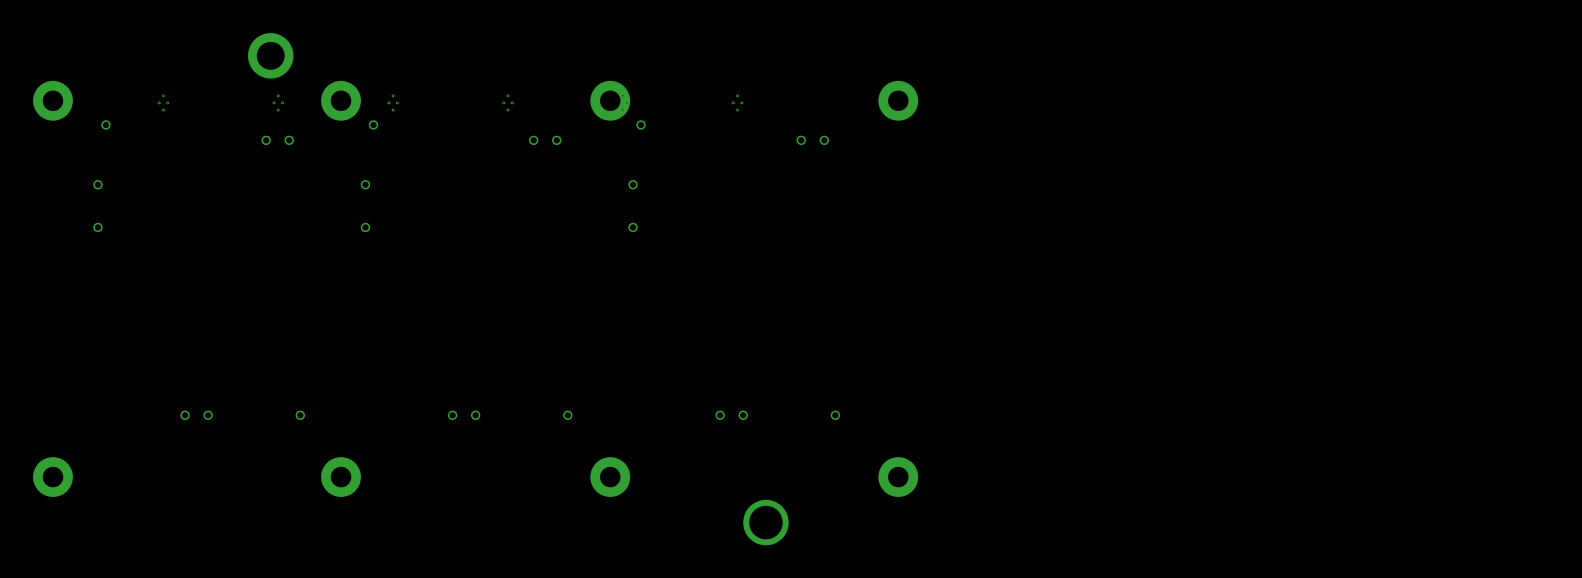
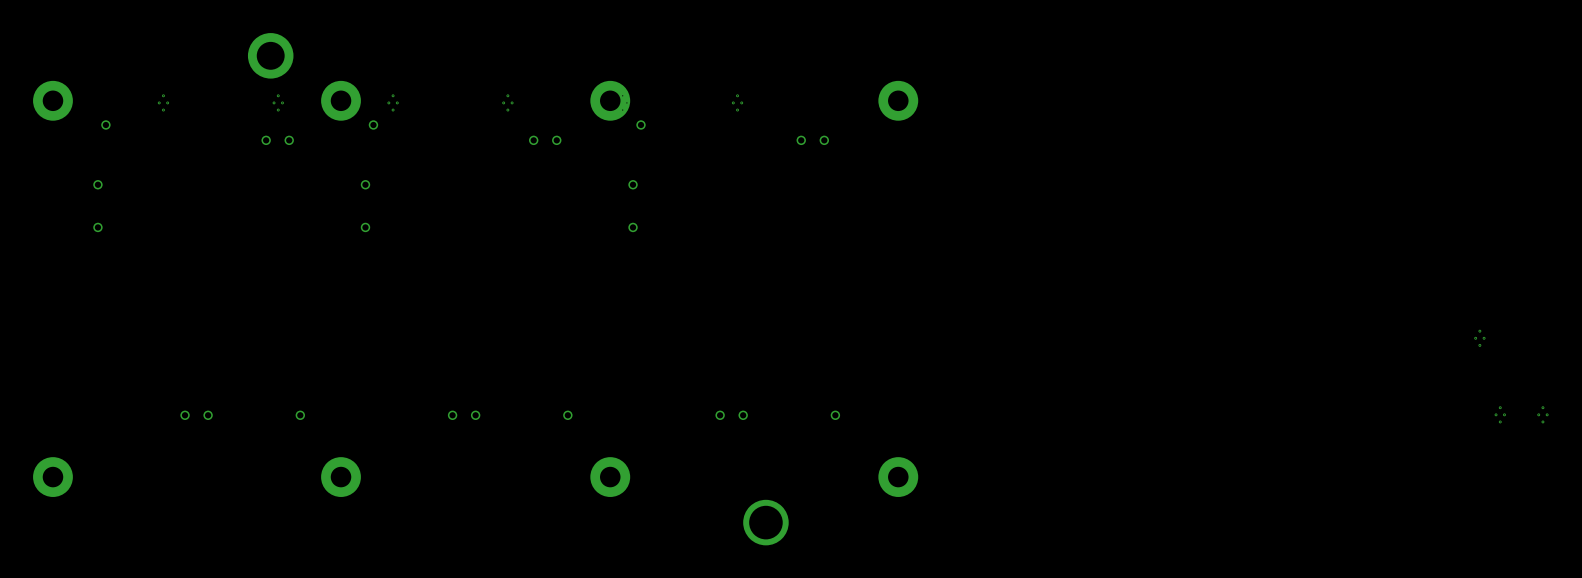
part: none -> (1479, 338)
part: none -> (1500, 414)
part: none -> (1542, 414)

